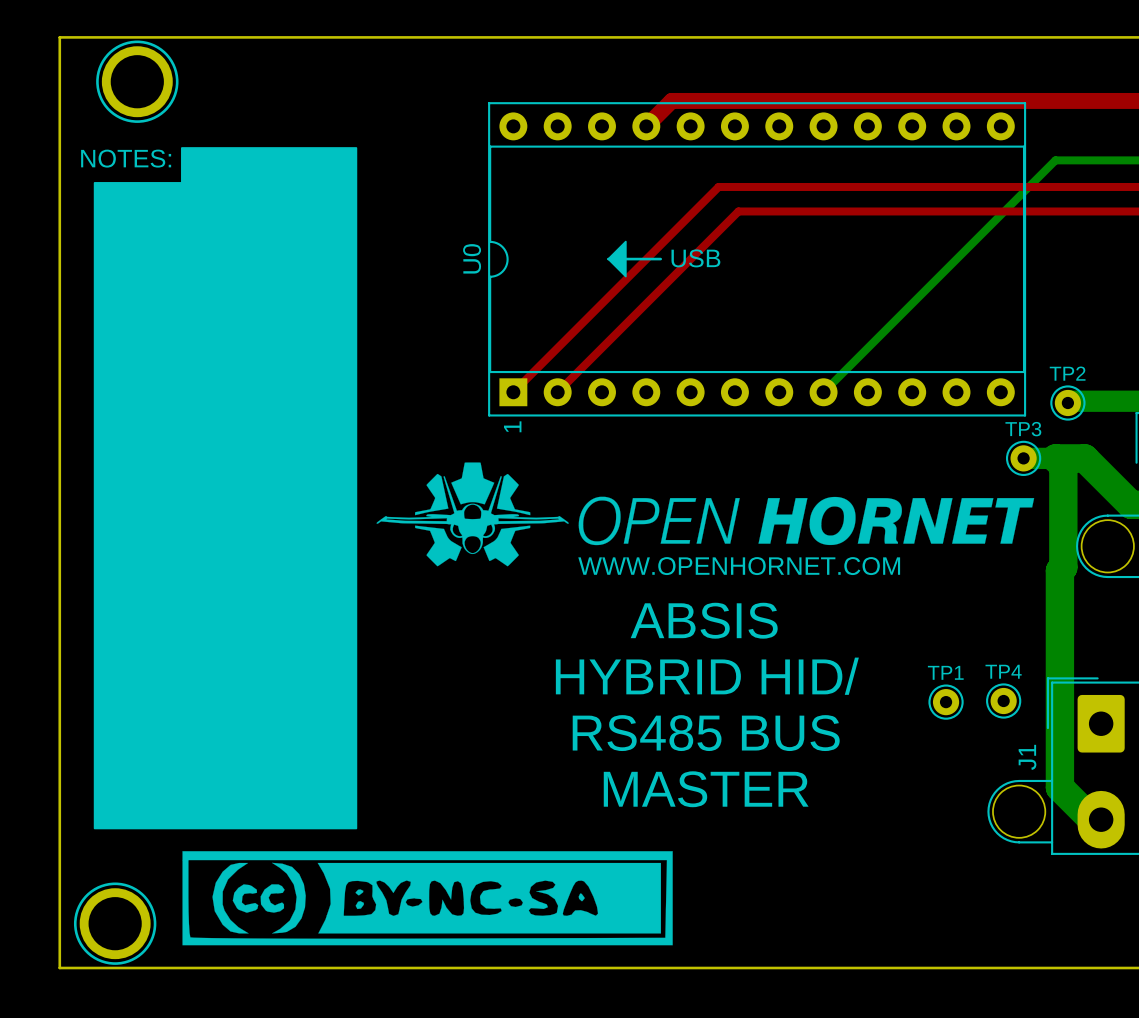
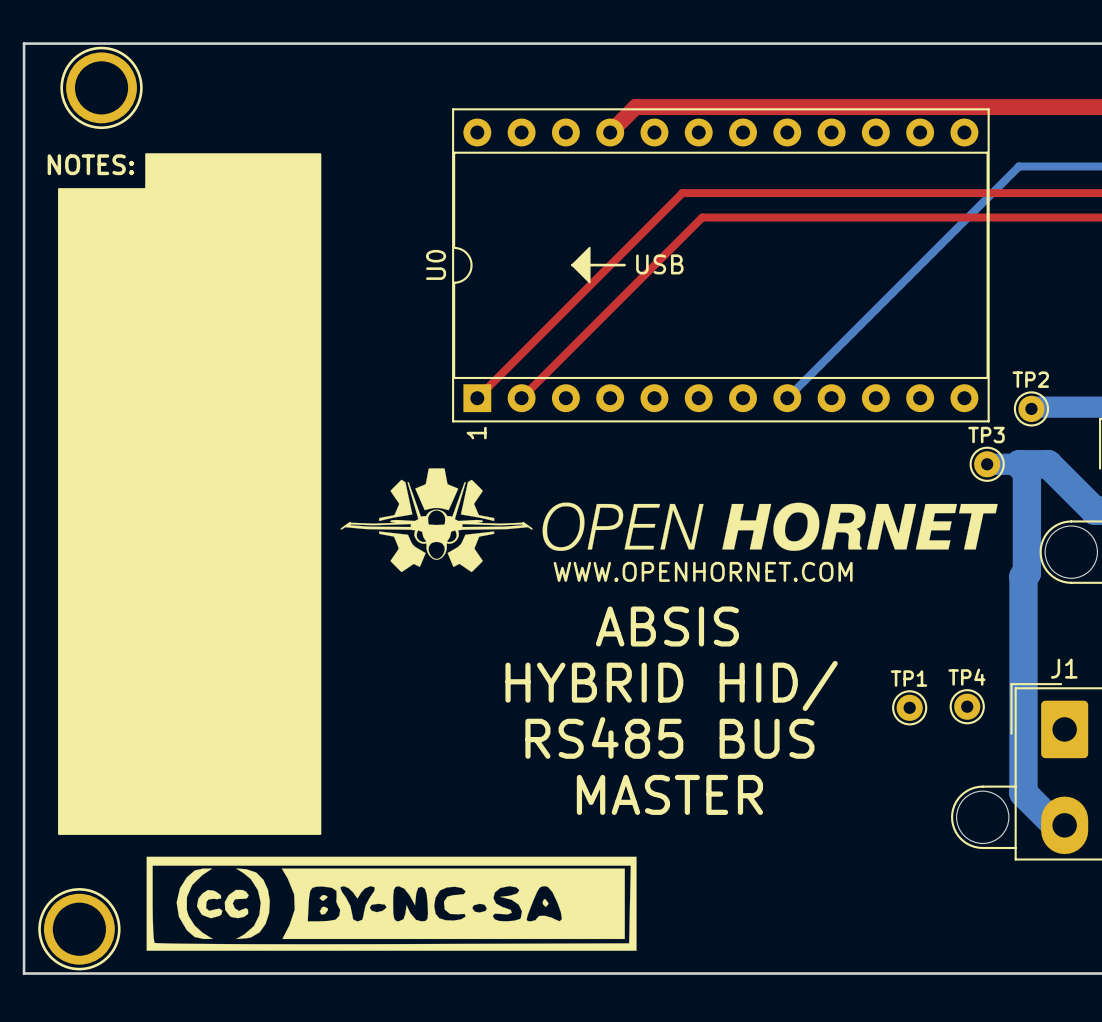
J1 name rotation: 0° (1027, 757) -> 90° clockwise (1064, 668)
J1 name position: J1 (1027, 757) -> J1 (1064, 668)

